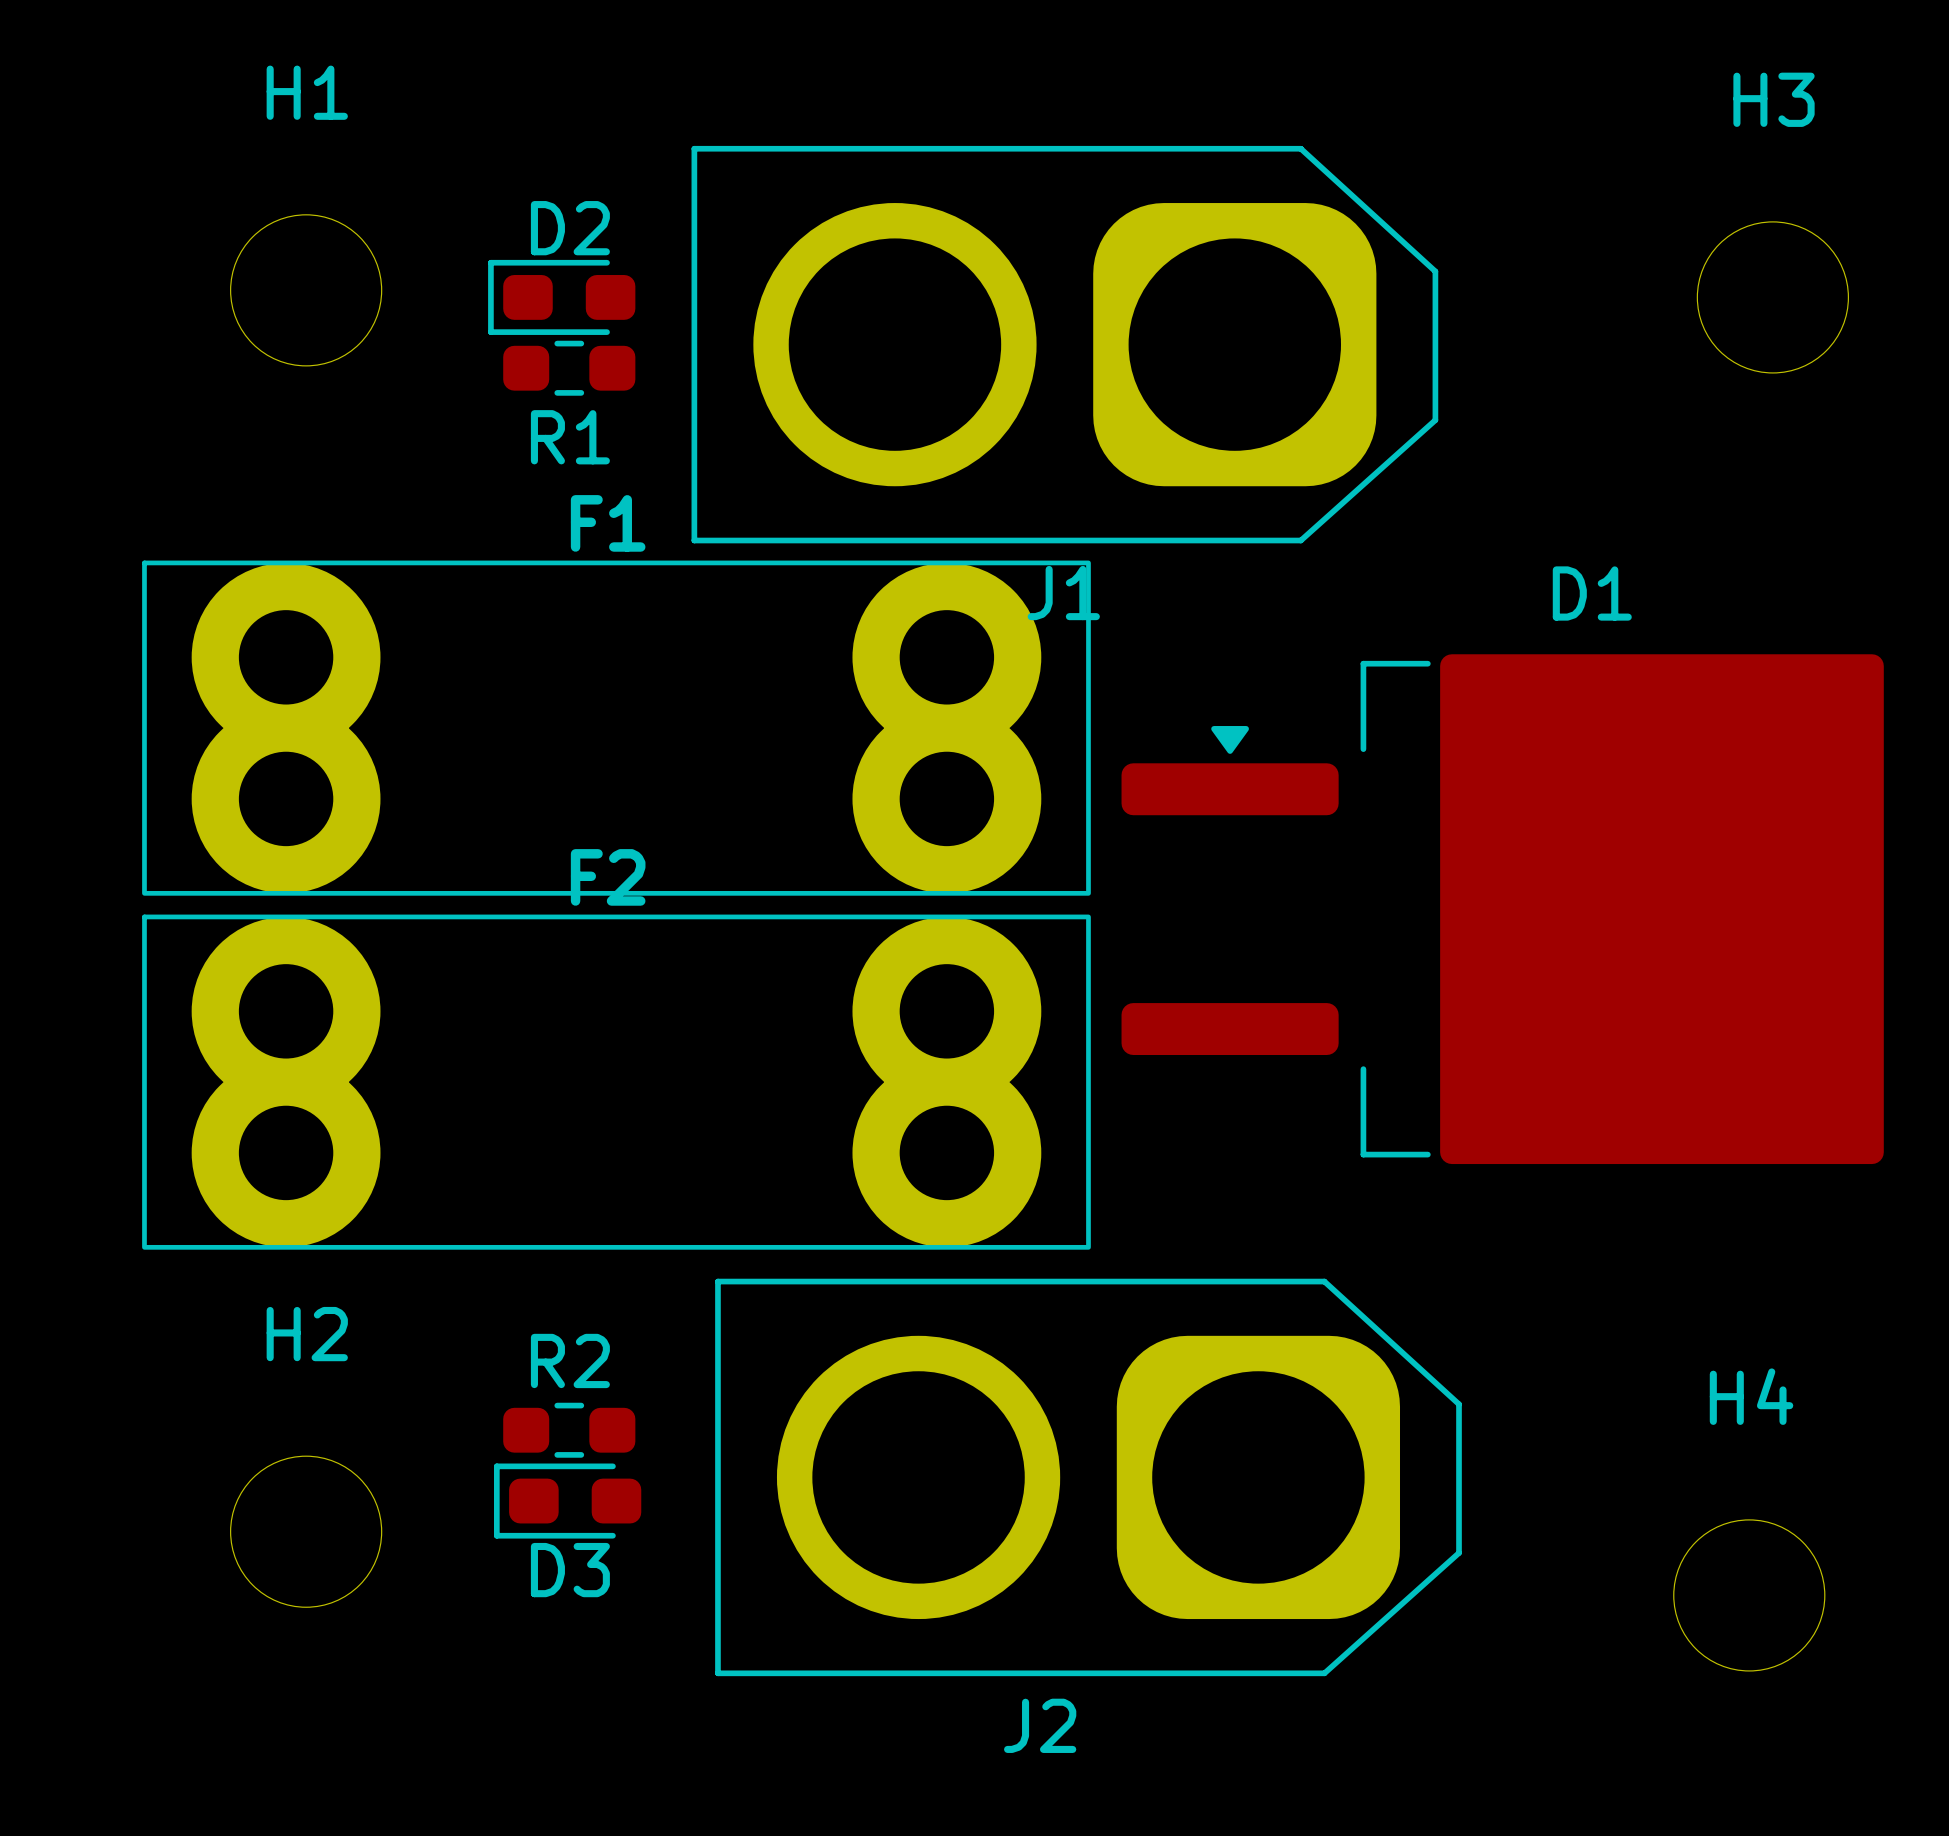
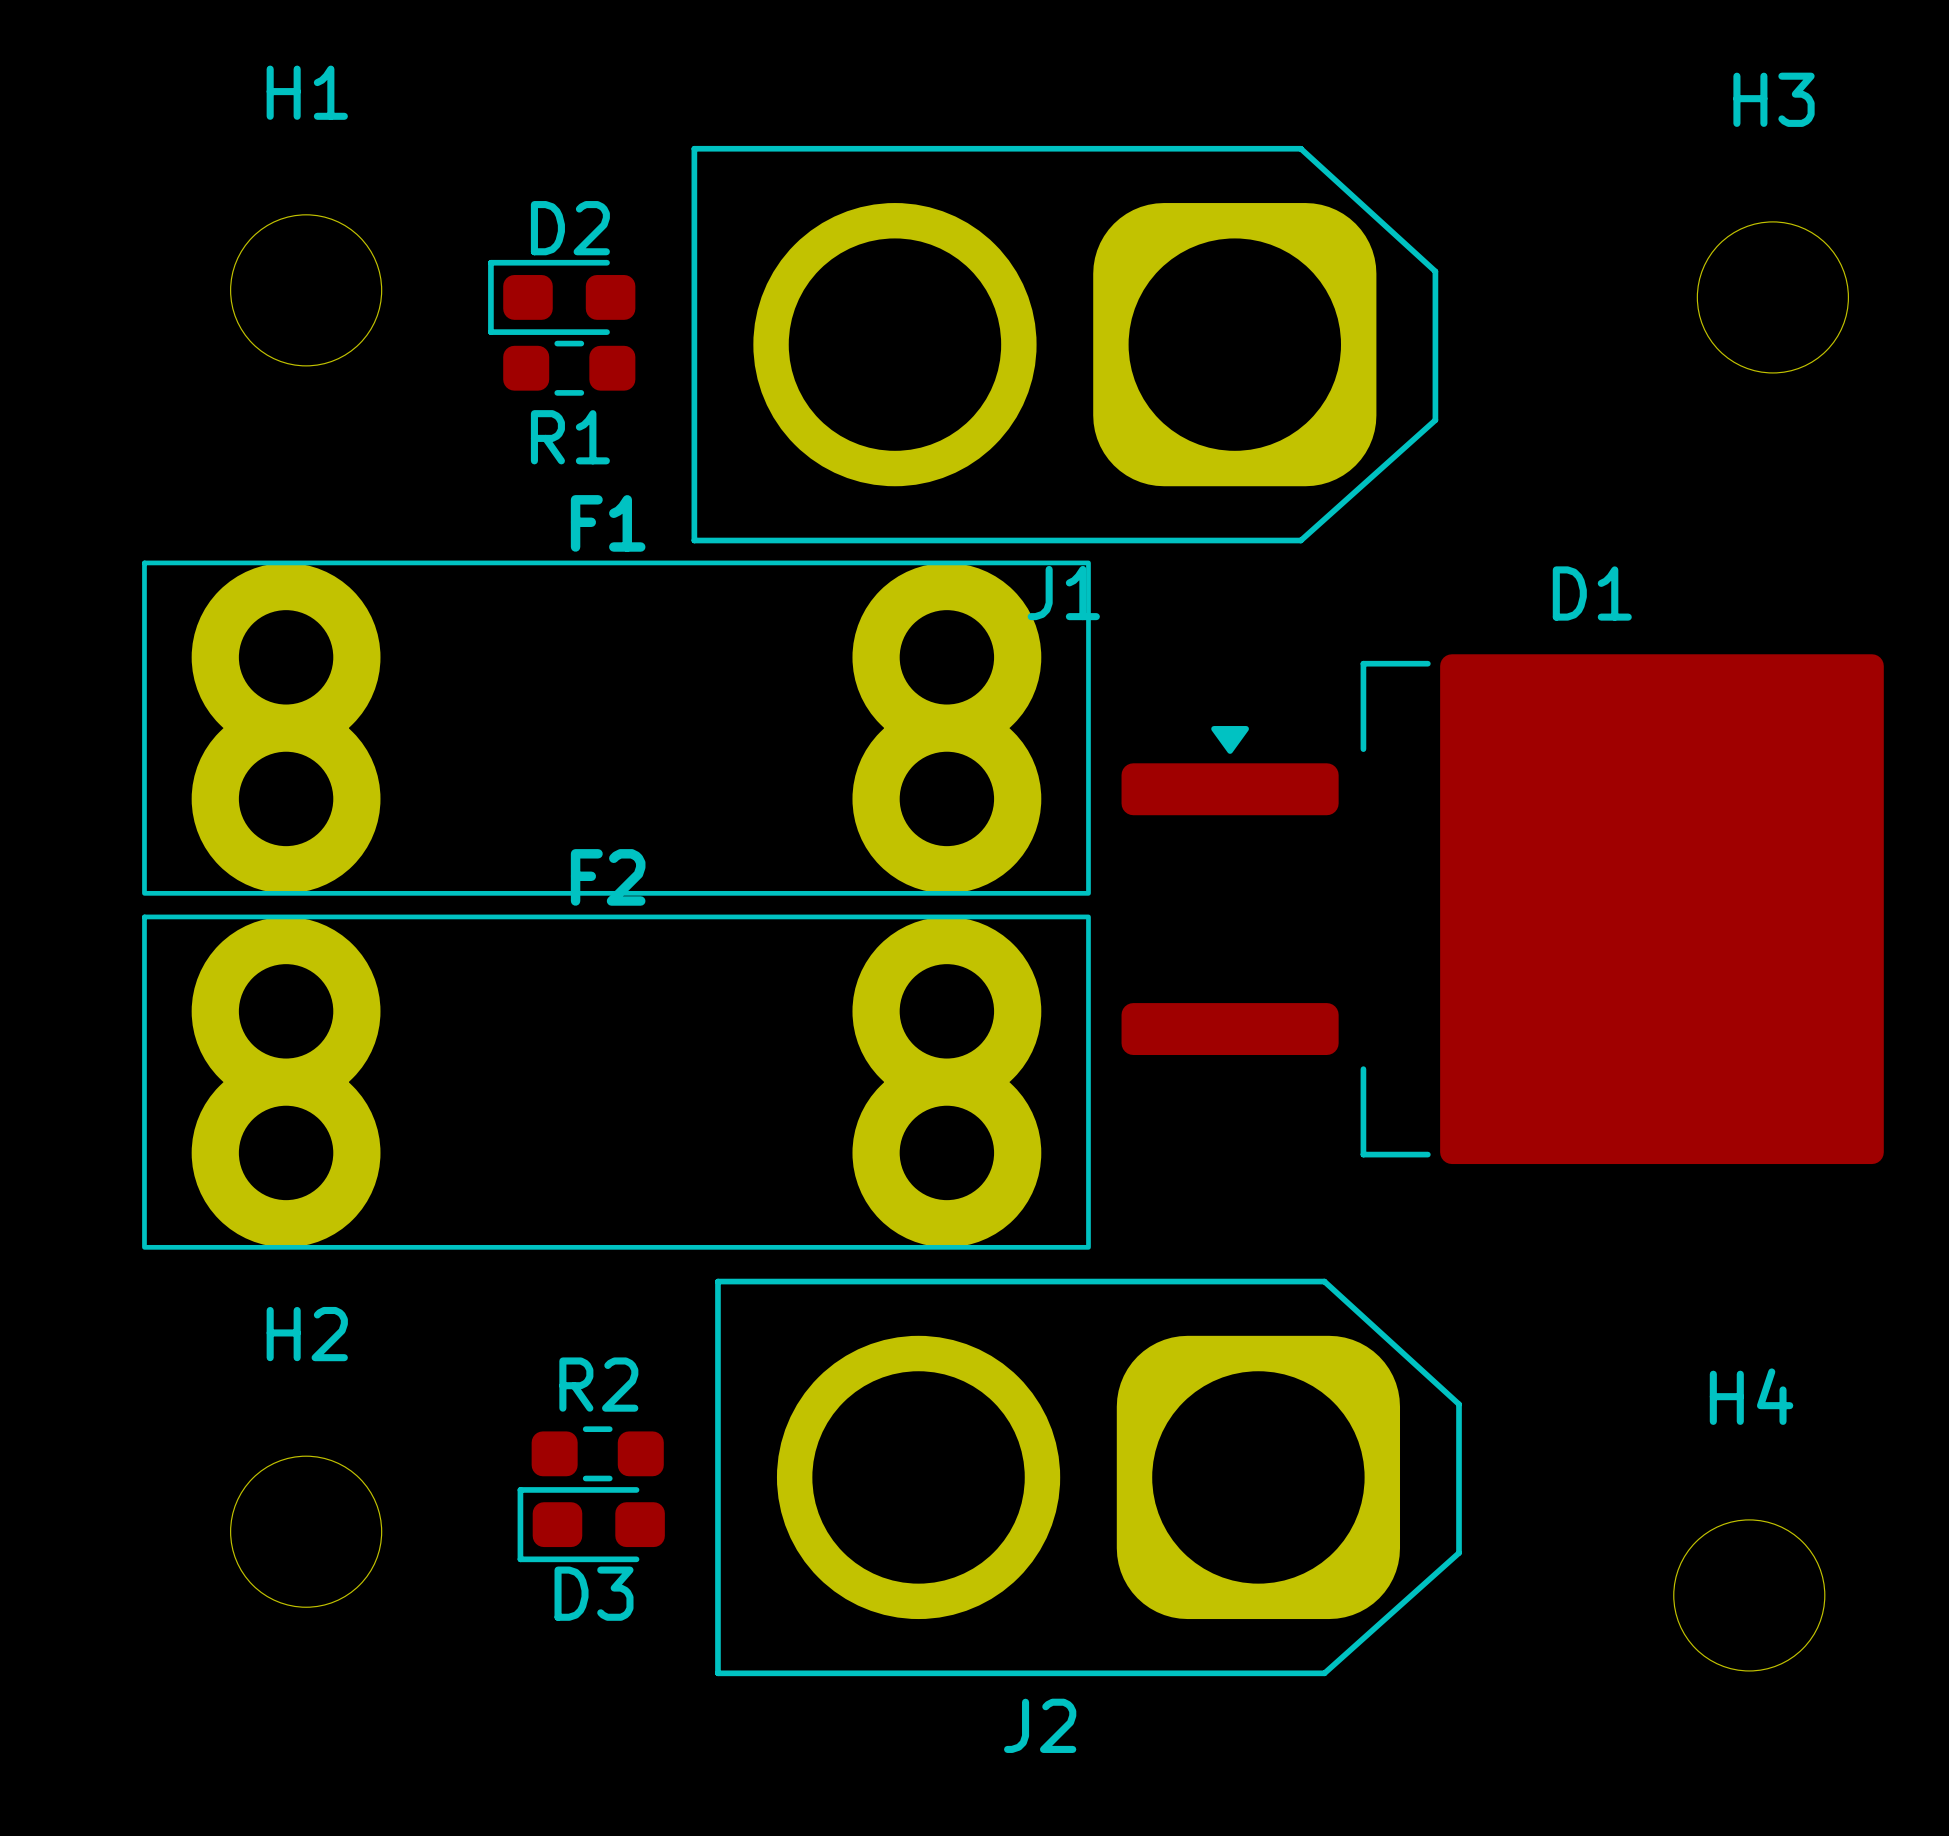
R2 position: (569, 1430) -> (597, 1453)
D3 position: (567, 1501) -> (591, 1524)

